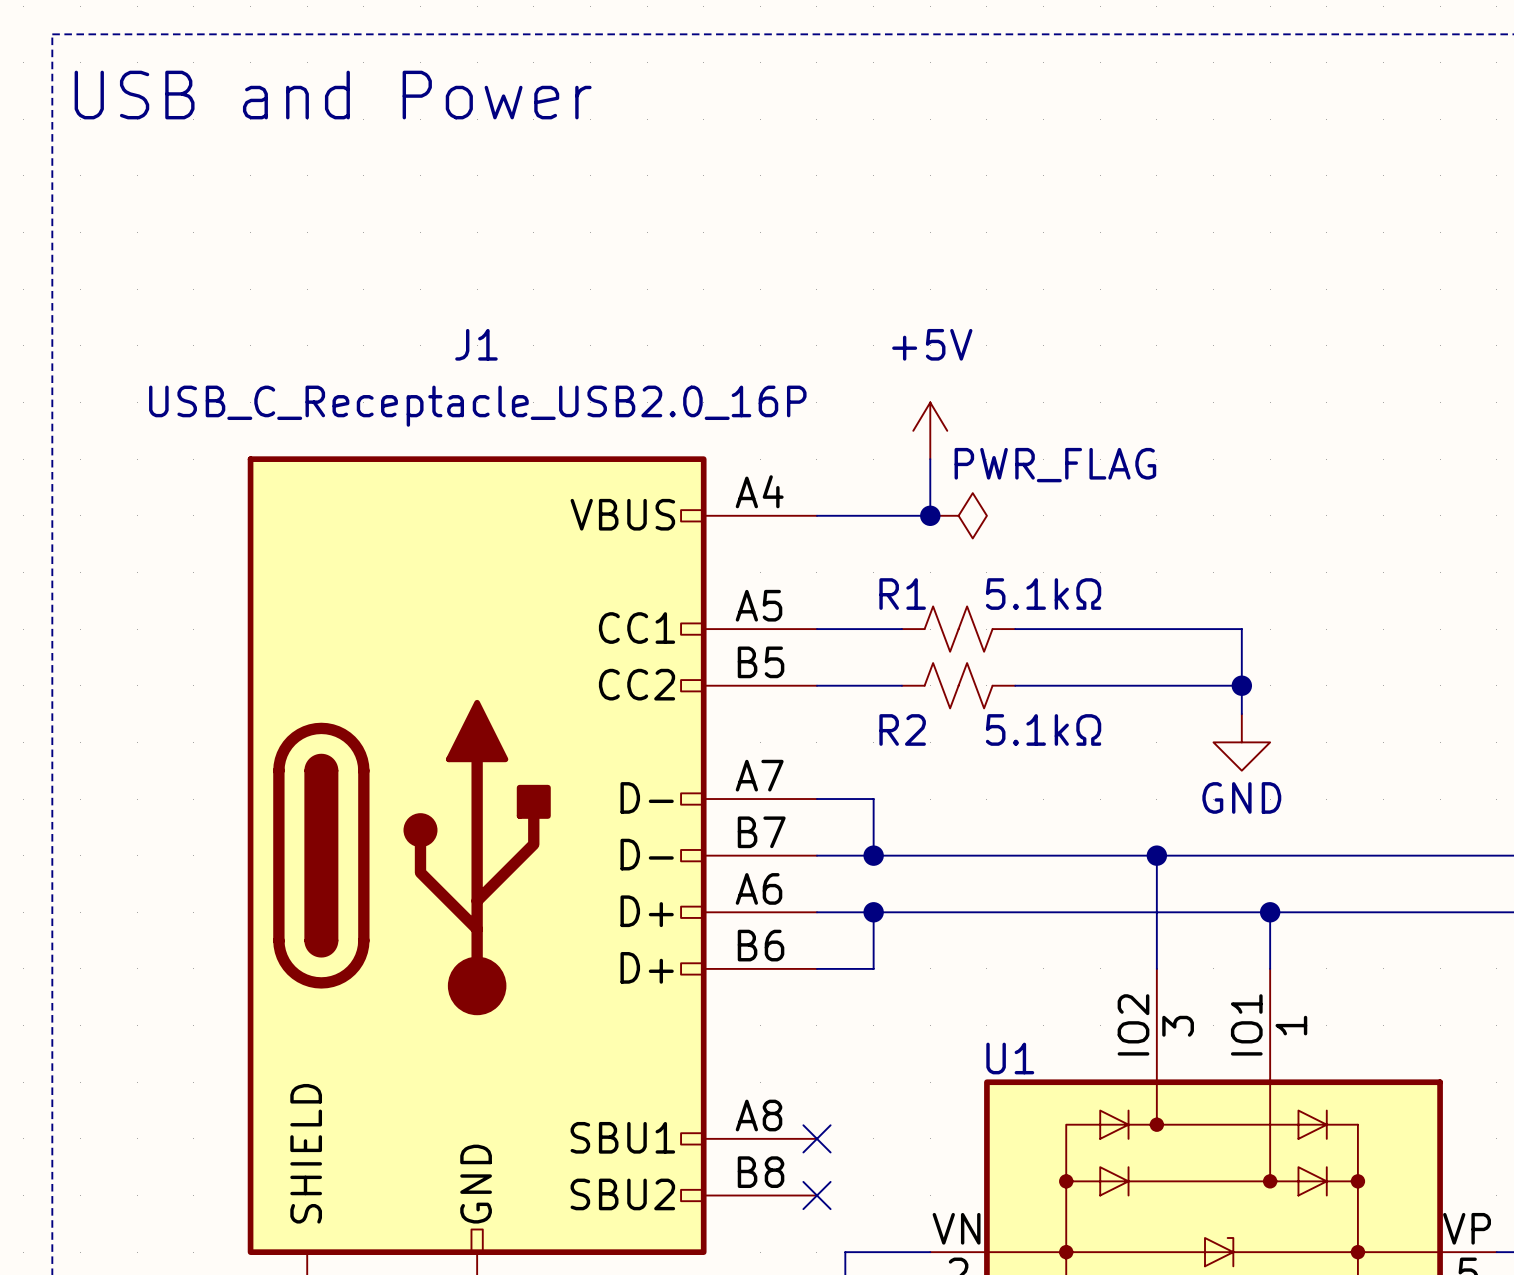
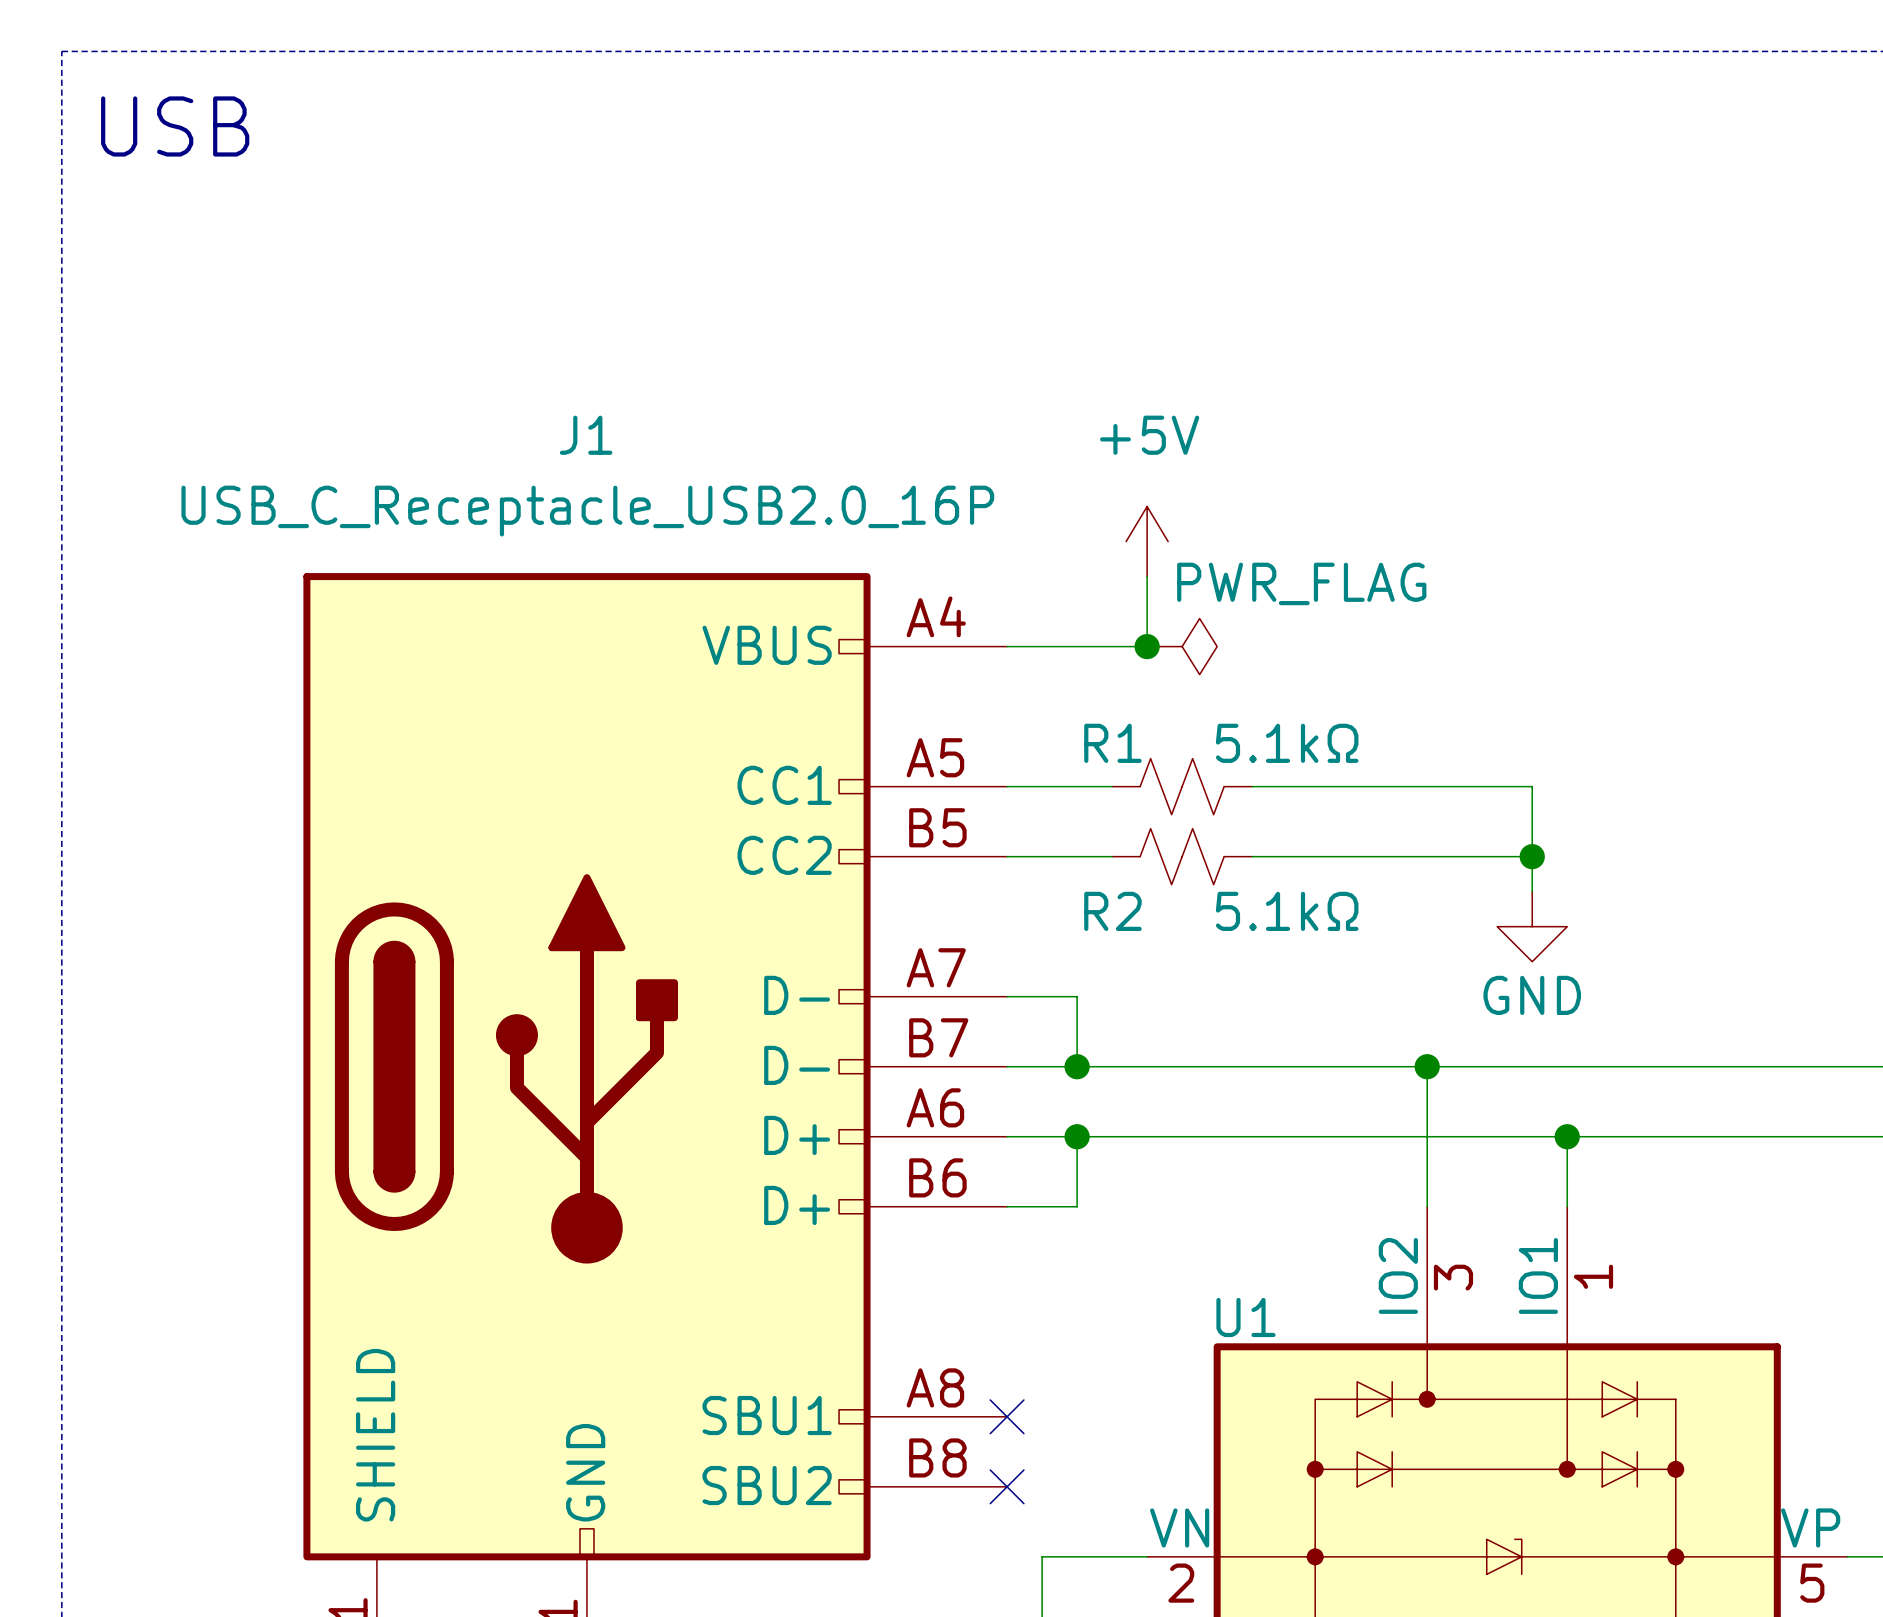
text: none -> USB (175, 126)
text: USB and Power (333, 95) -> none

